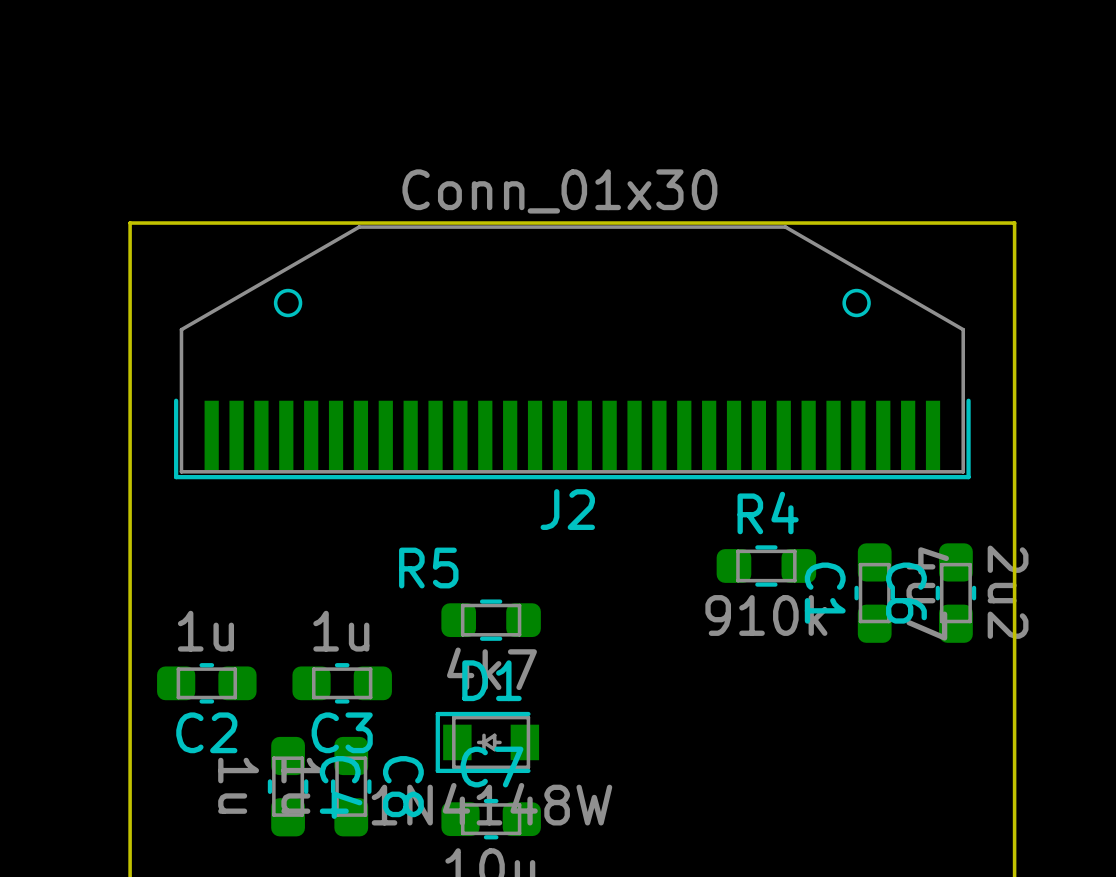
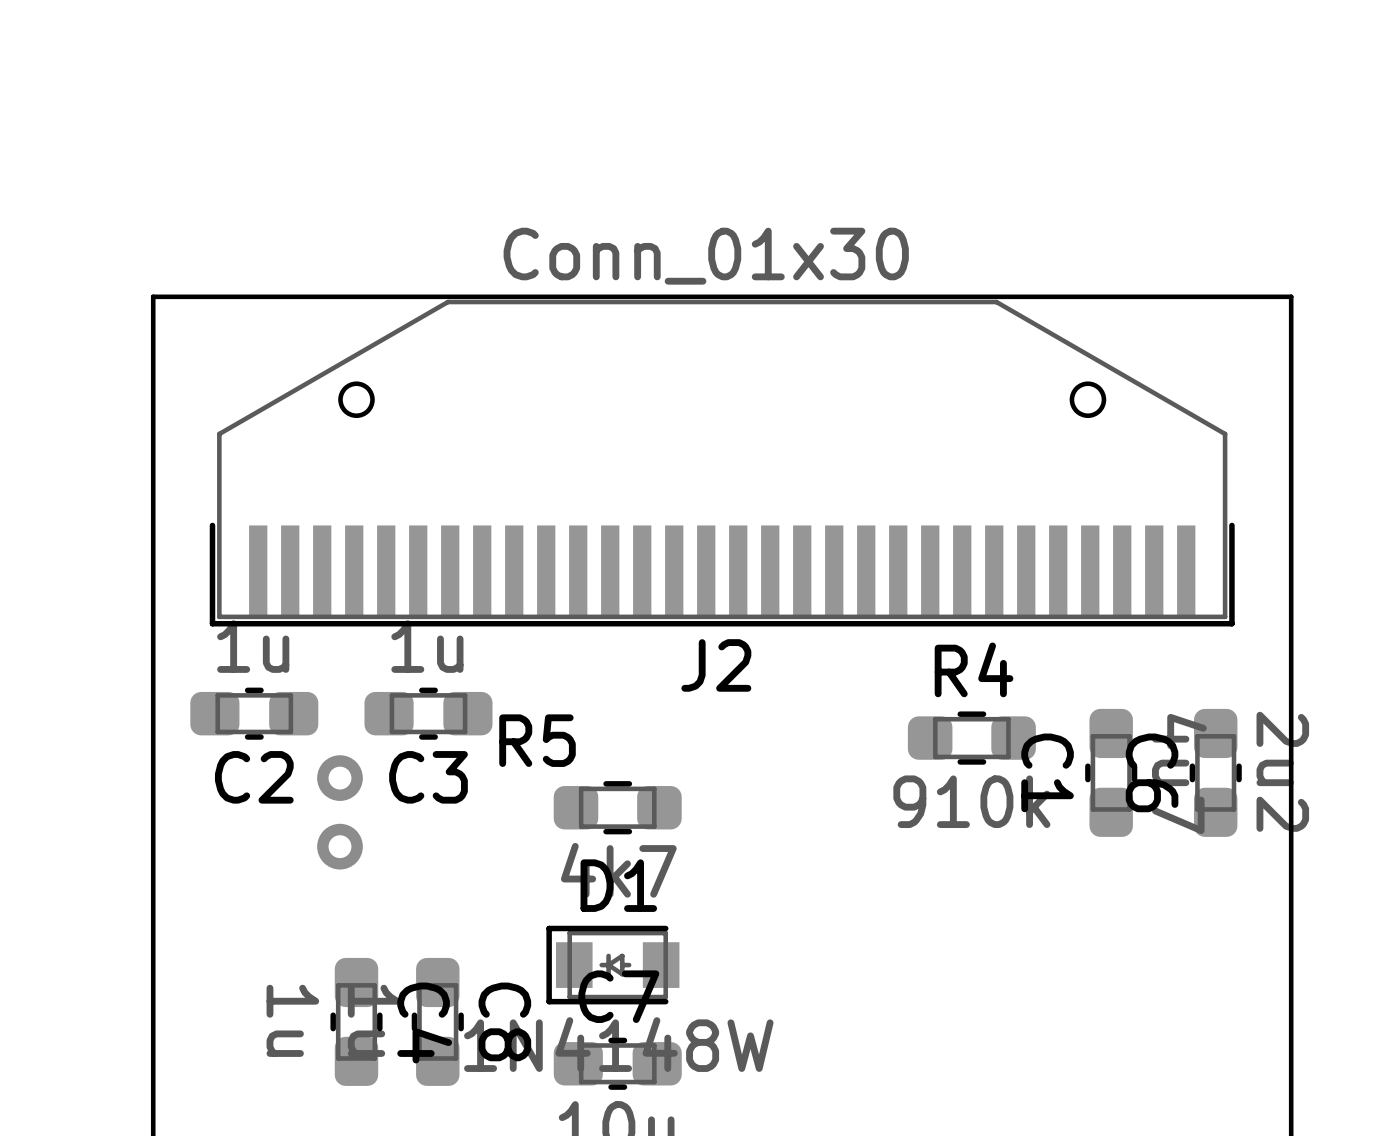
part: none -> (339, 812)
C2 position: (206, 683) -> (254, 713)
C3 position: (342, 683) -> (428, 713)

